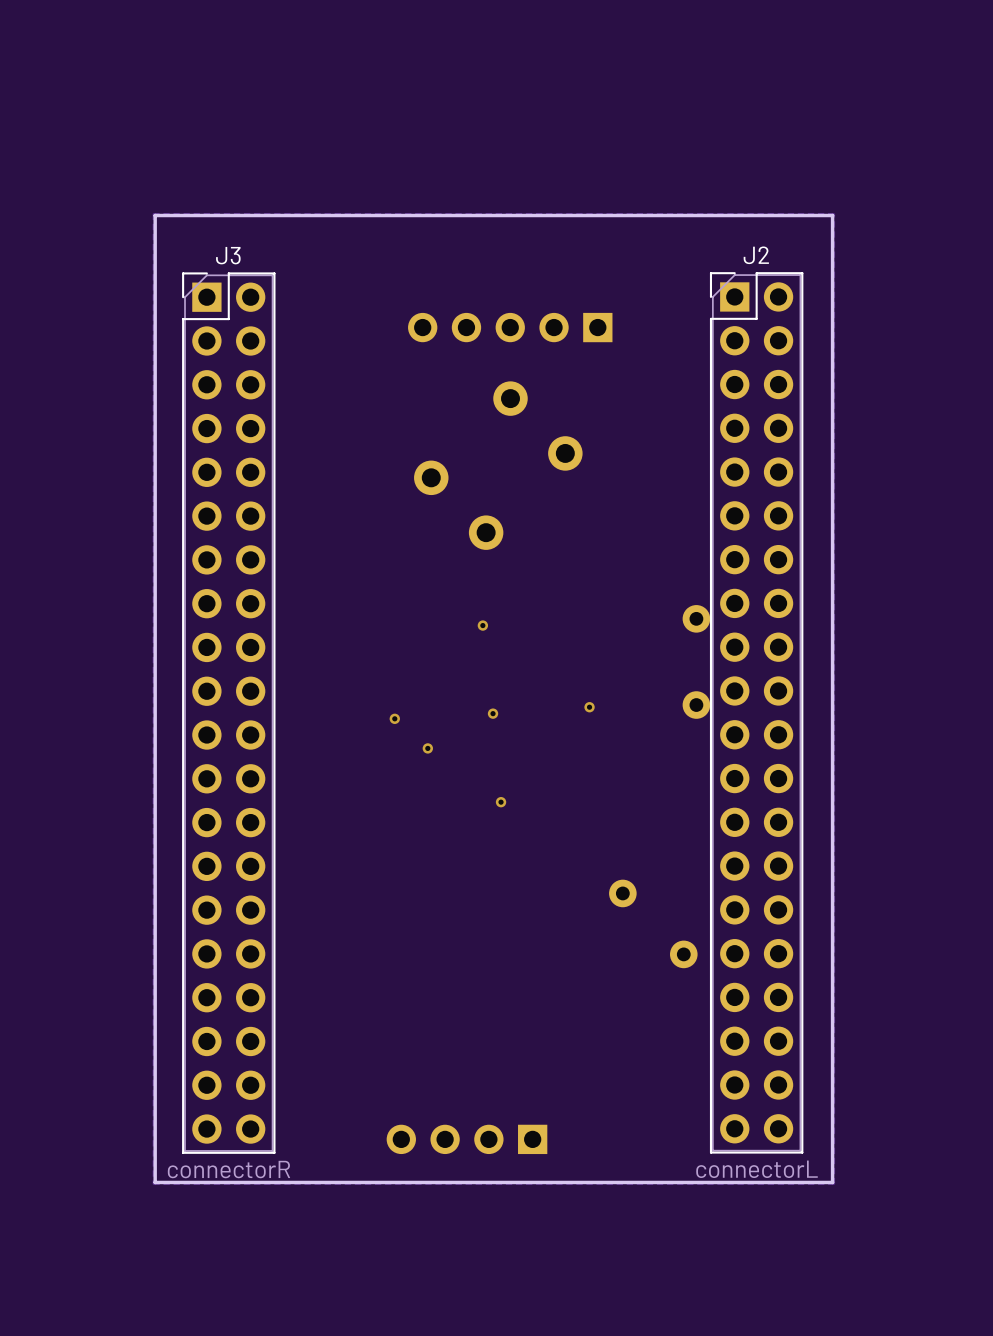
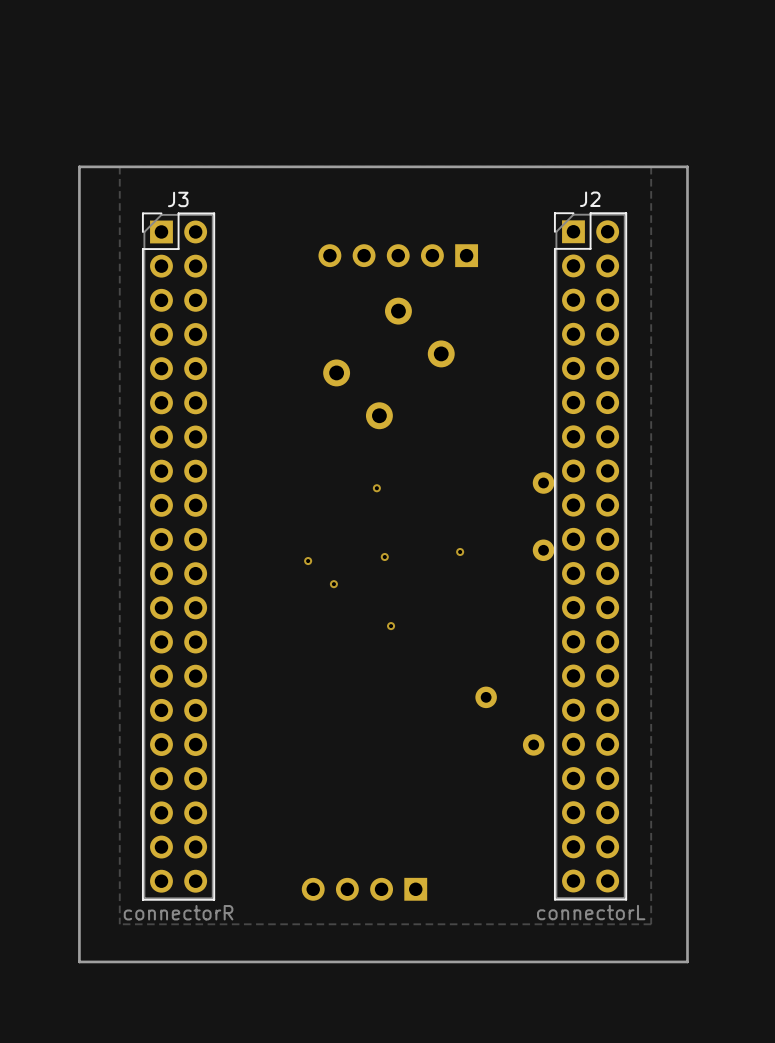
board edge: (832, 215) (155, 215) (155, 1182) (832, 1182) (832, 215) -> (687, 166) (687, 961) (79, 961) (79, 166) (687, 166)

